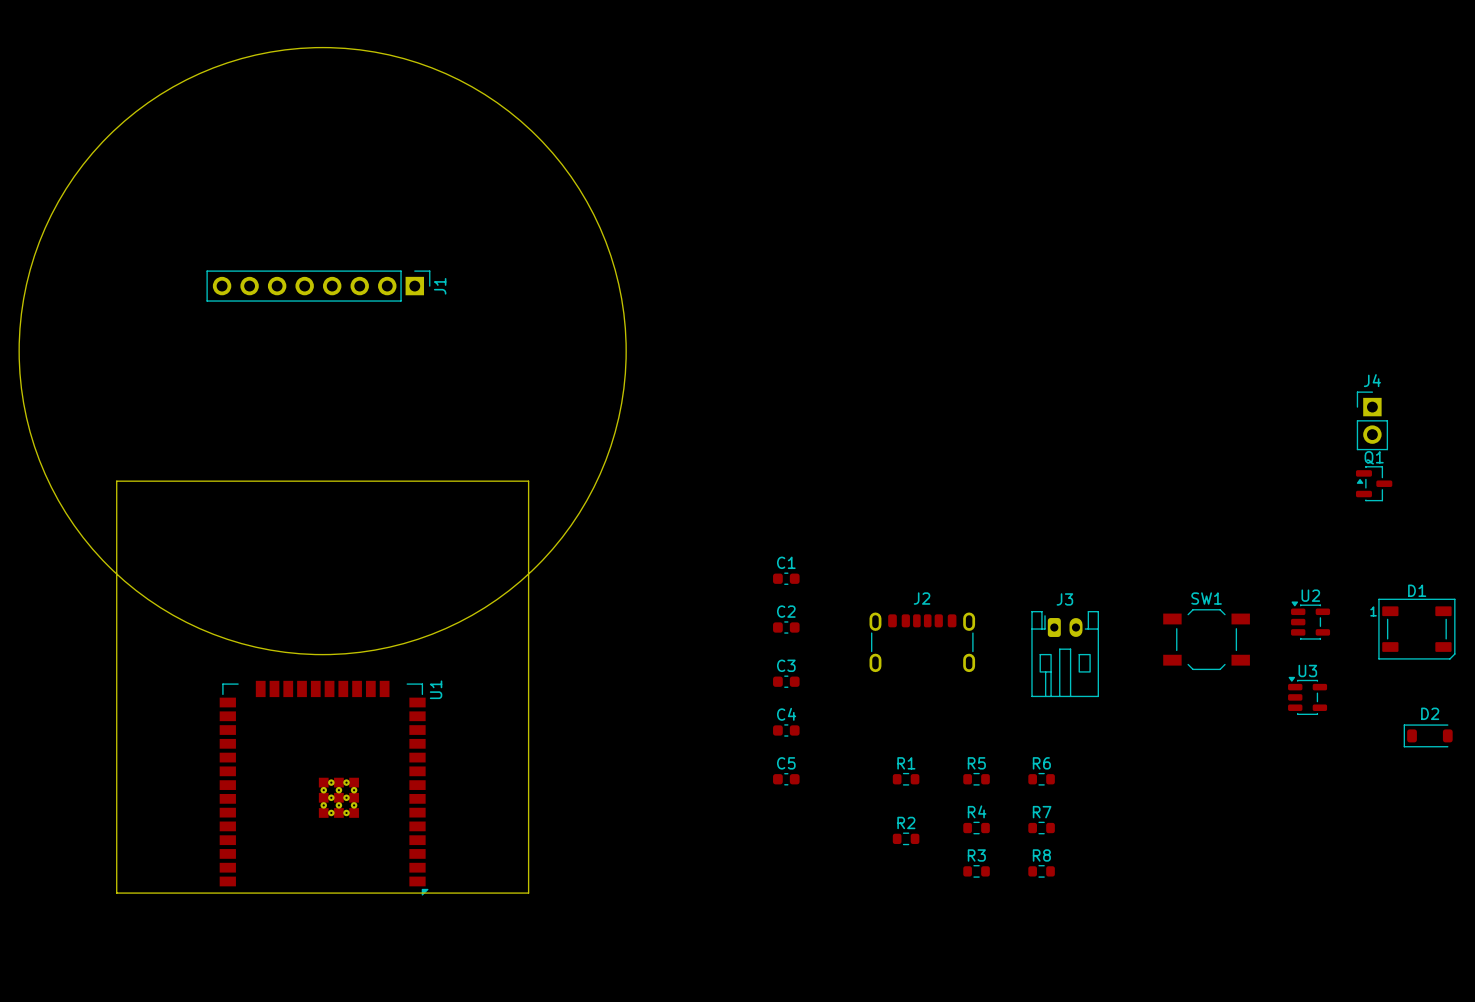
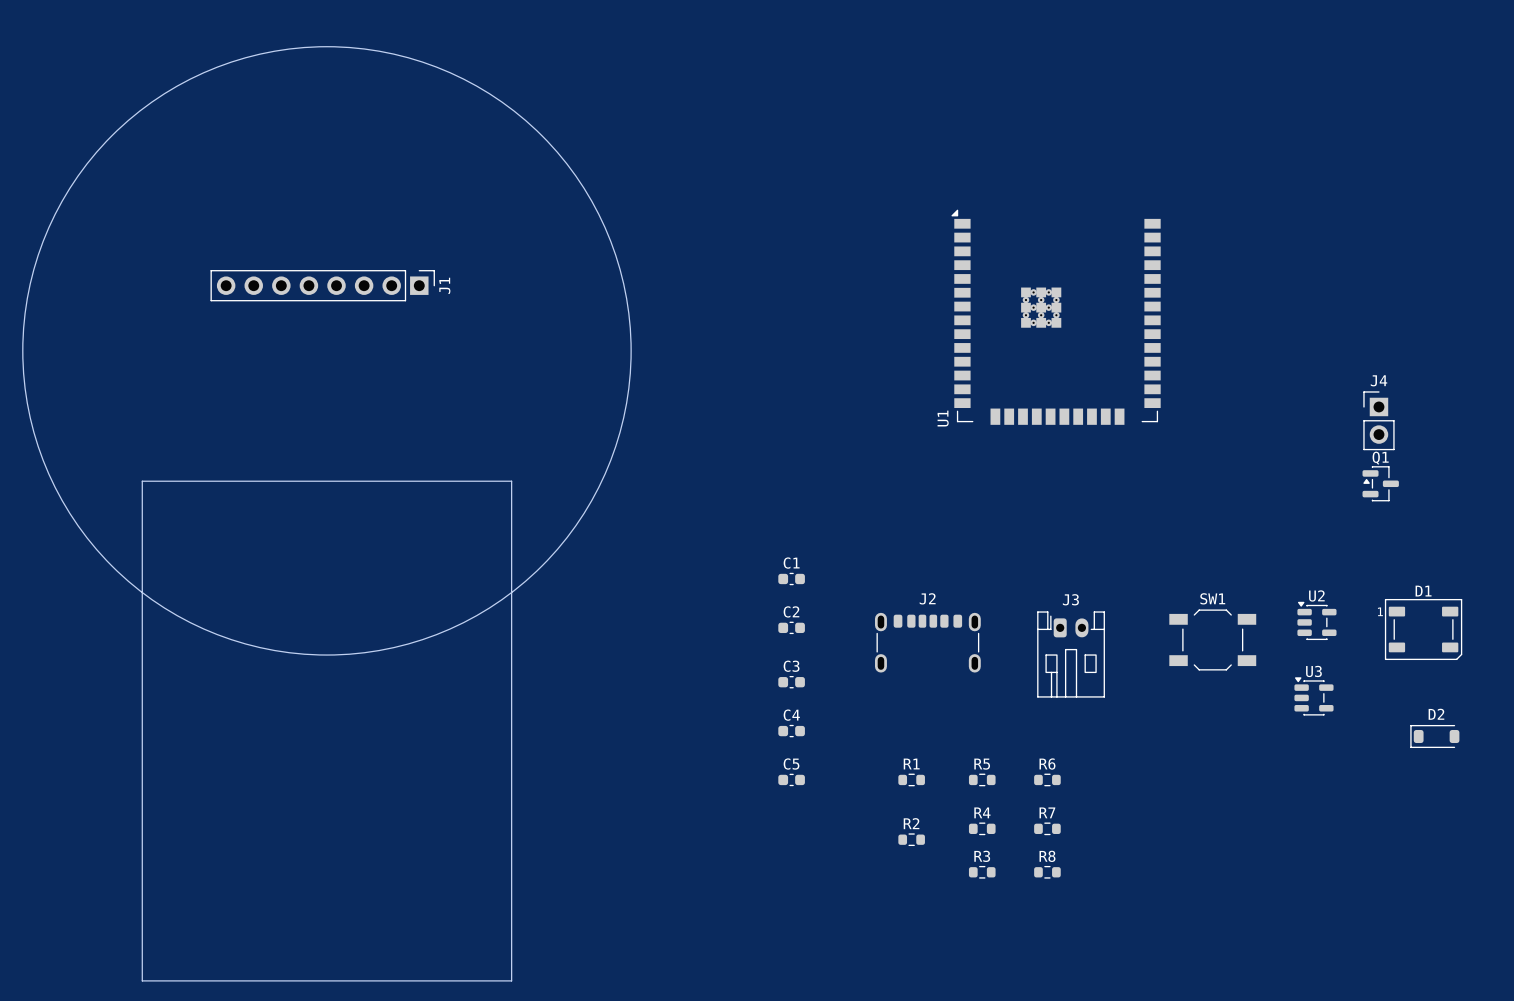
board edge: (138, 481) (116, 481) (116, 893) (528, 893) (528, 481) (506, 481) -> (142, 481) (142, 980) (511, 980) (511, 481)
U1 rotation: 0° (324, 788) -> 180° (1056, 317)
U1 position: (324, 788) -> (1056, 317)

